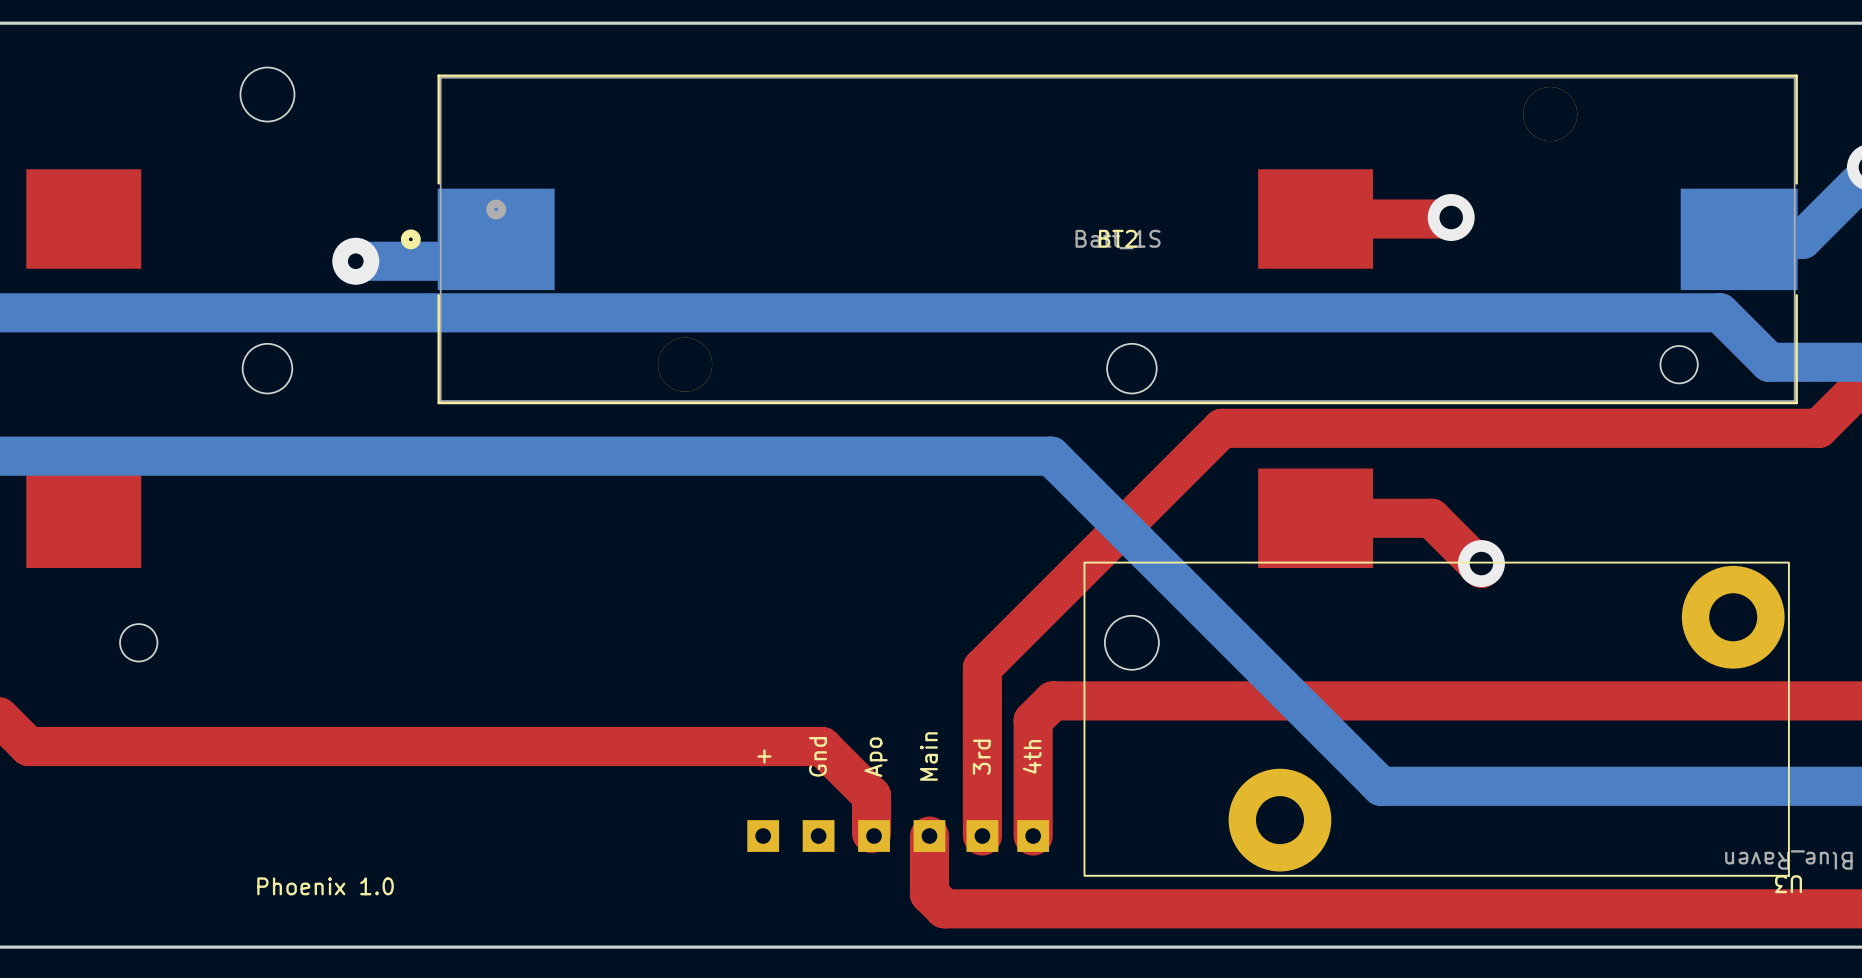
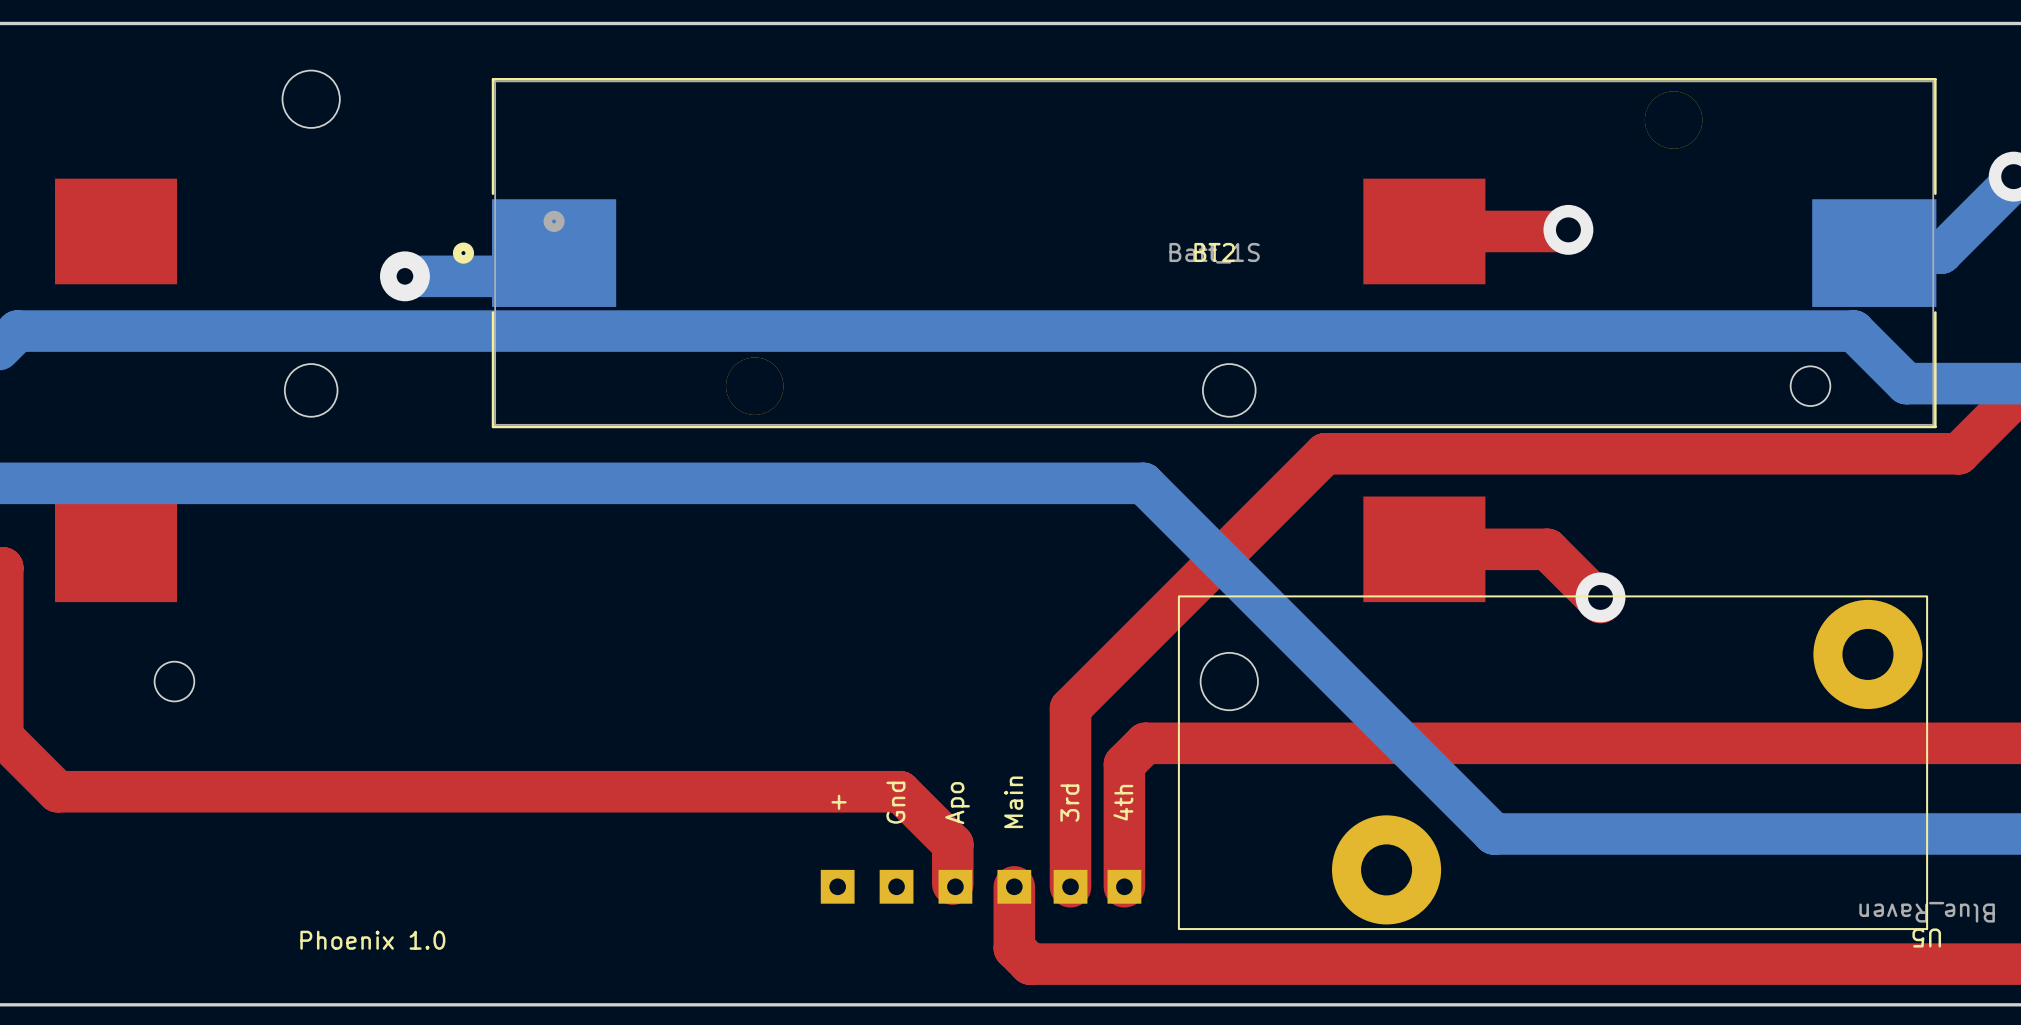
U3 name: U3 (1788, 884) -> U5 (1926, 937)

